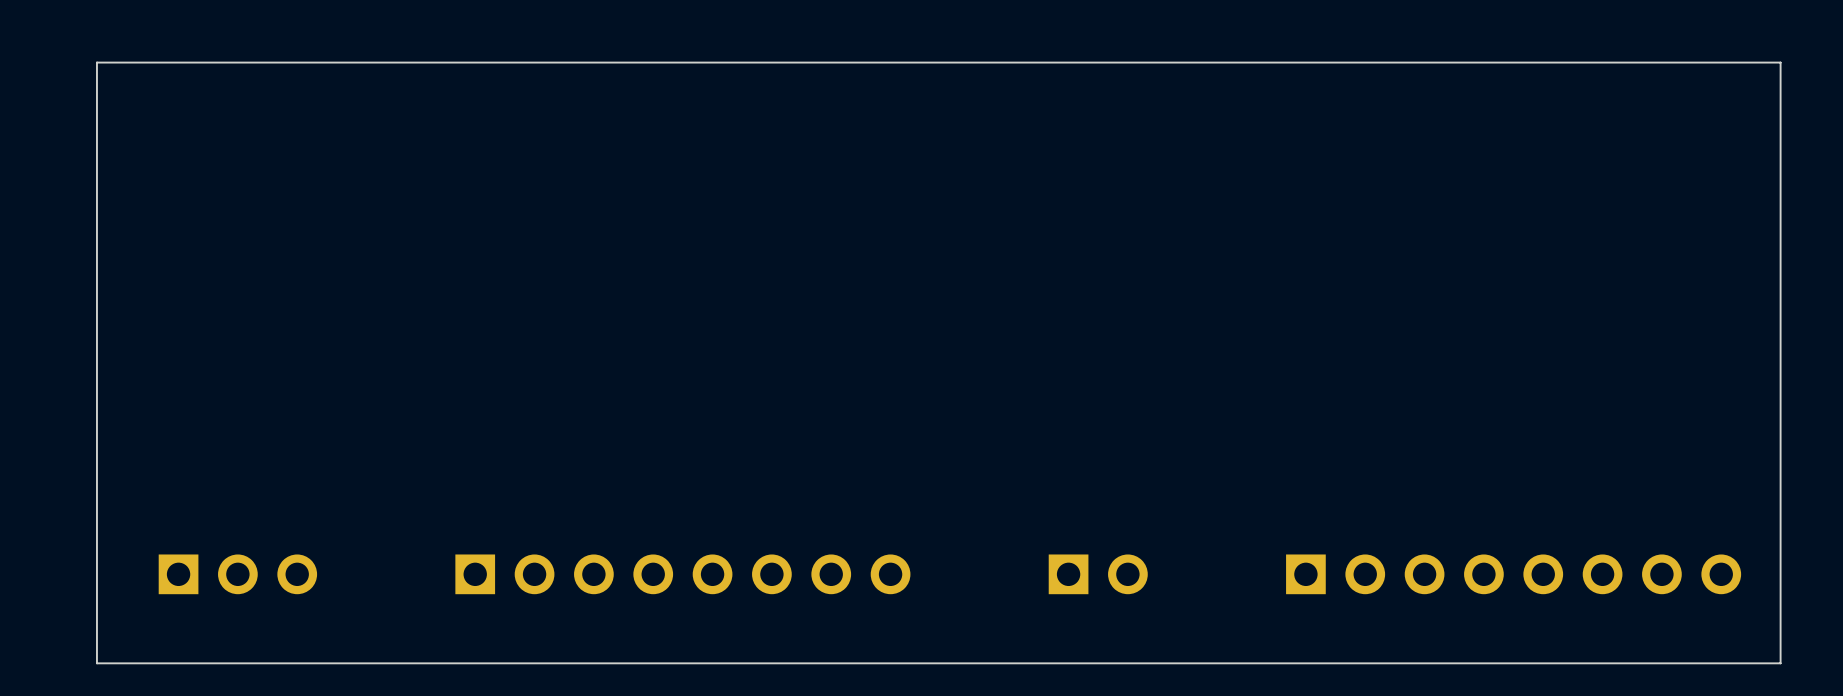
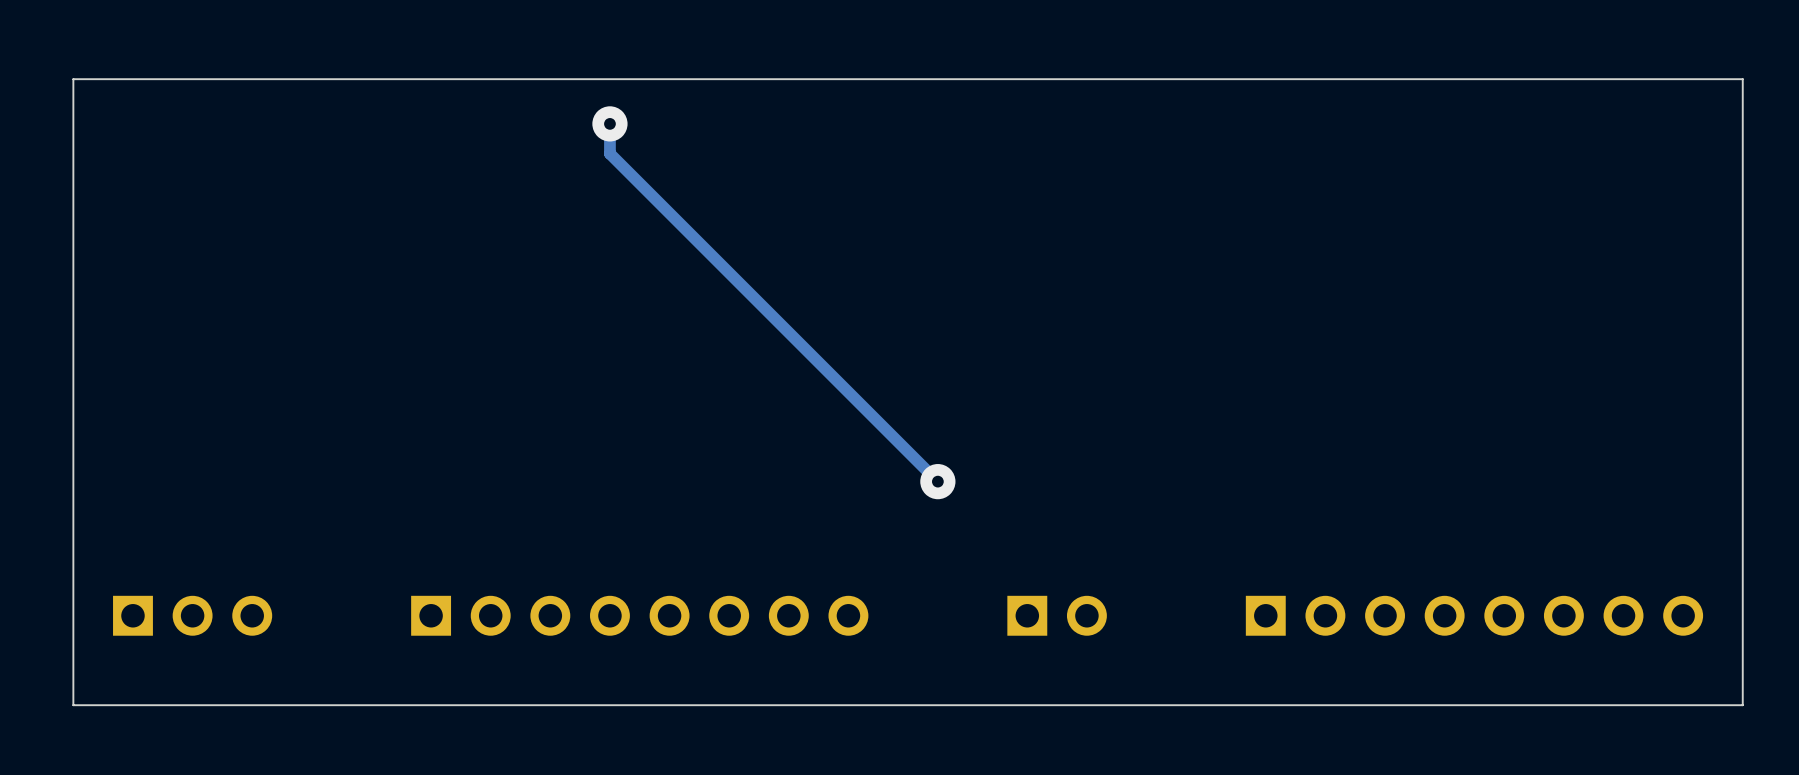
board edge: (1780, 62) (96, 62) (96, 663) (119, 663) -> (1742, 101) (1742, 79) (73, 79) (73, 705)
track: none -> (609, 123) (609, 153) (937, 481)
via: none -> (609, 123)
via: none -> (937, 481)

